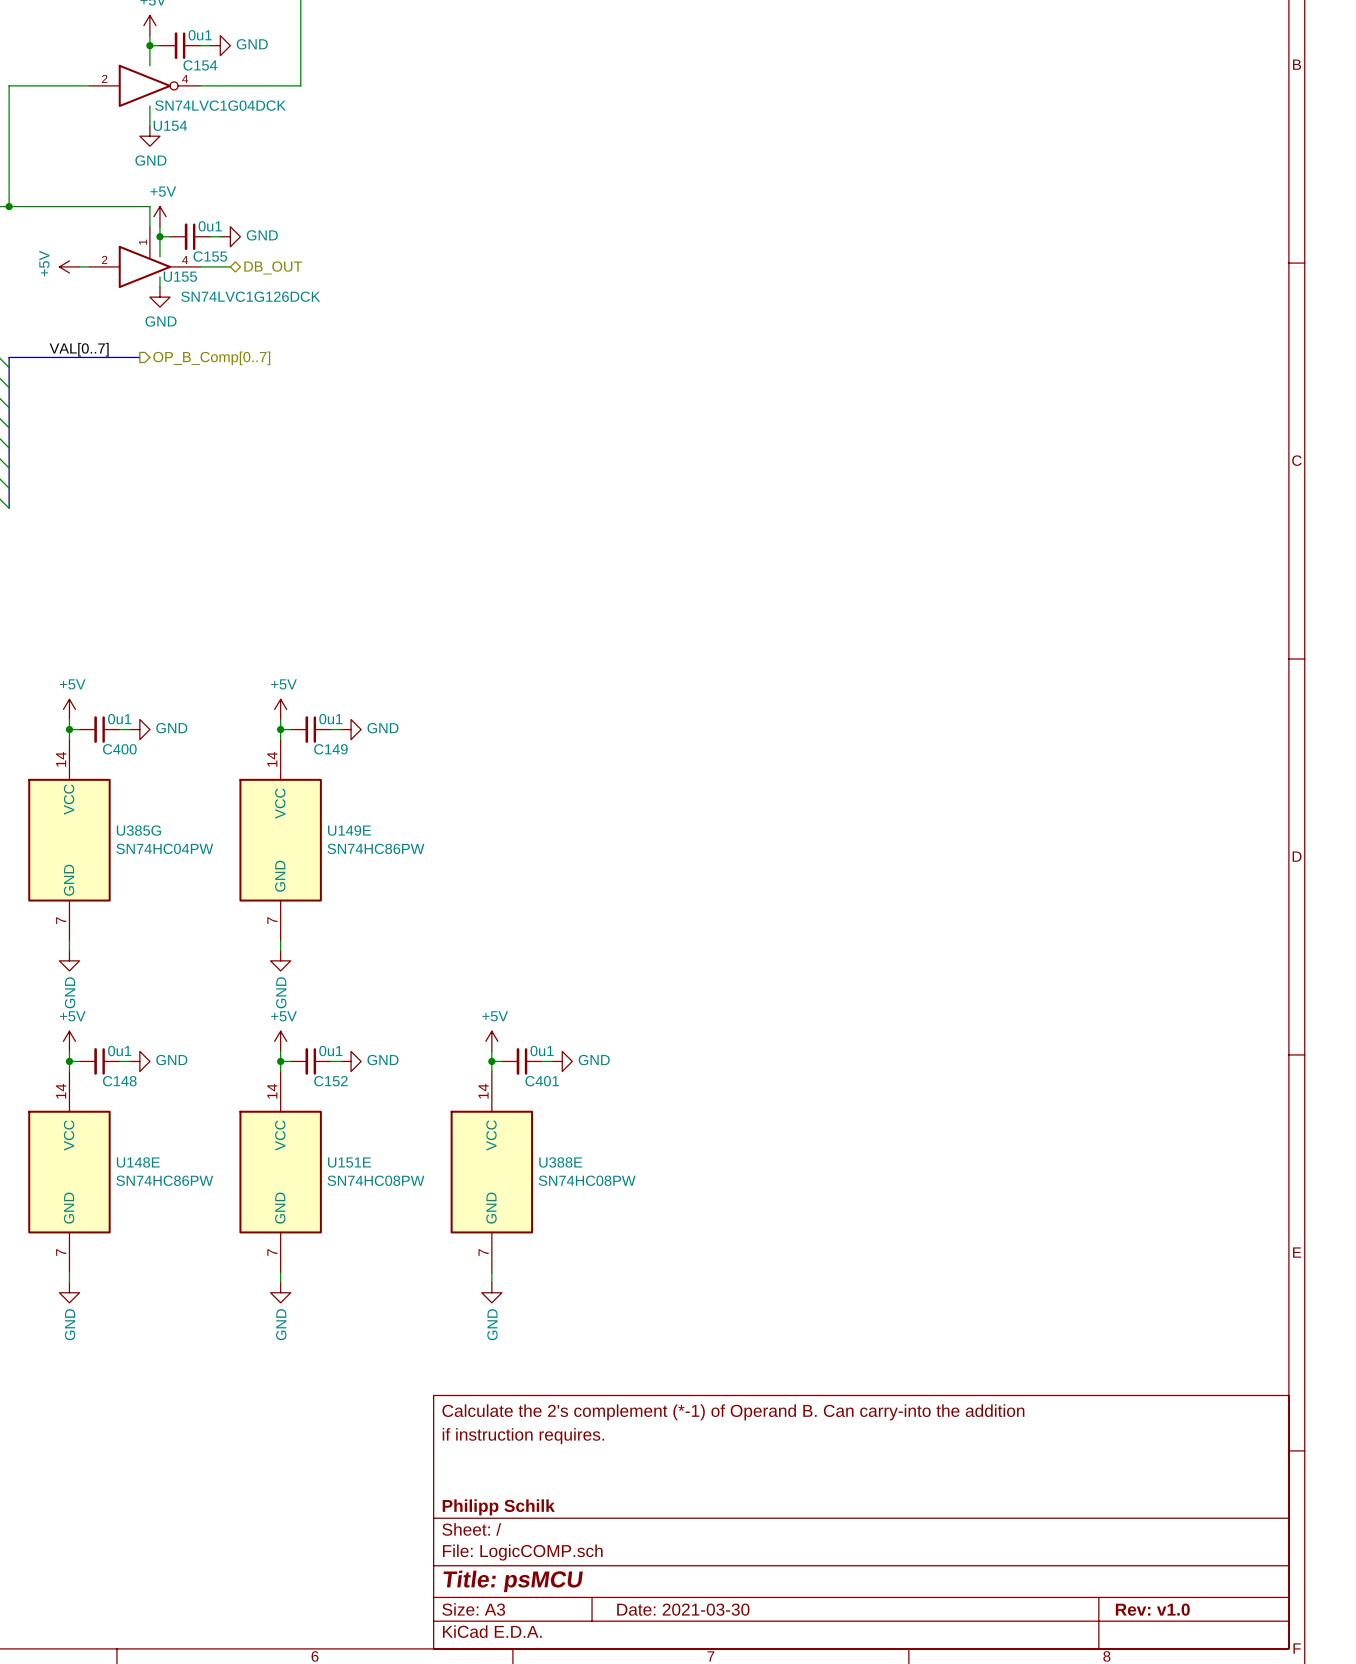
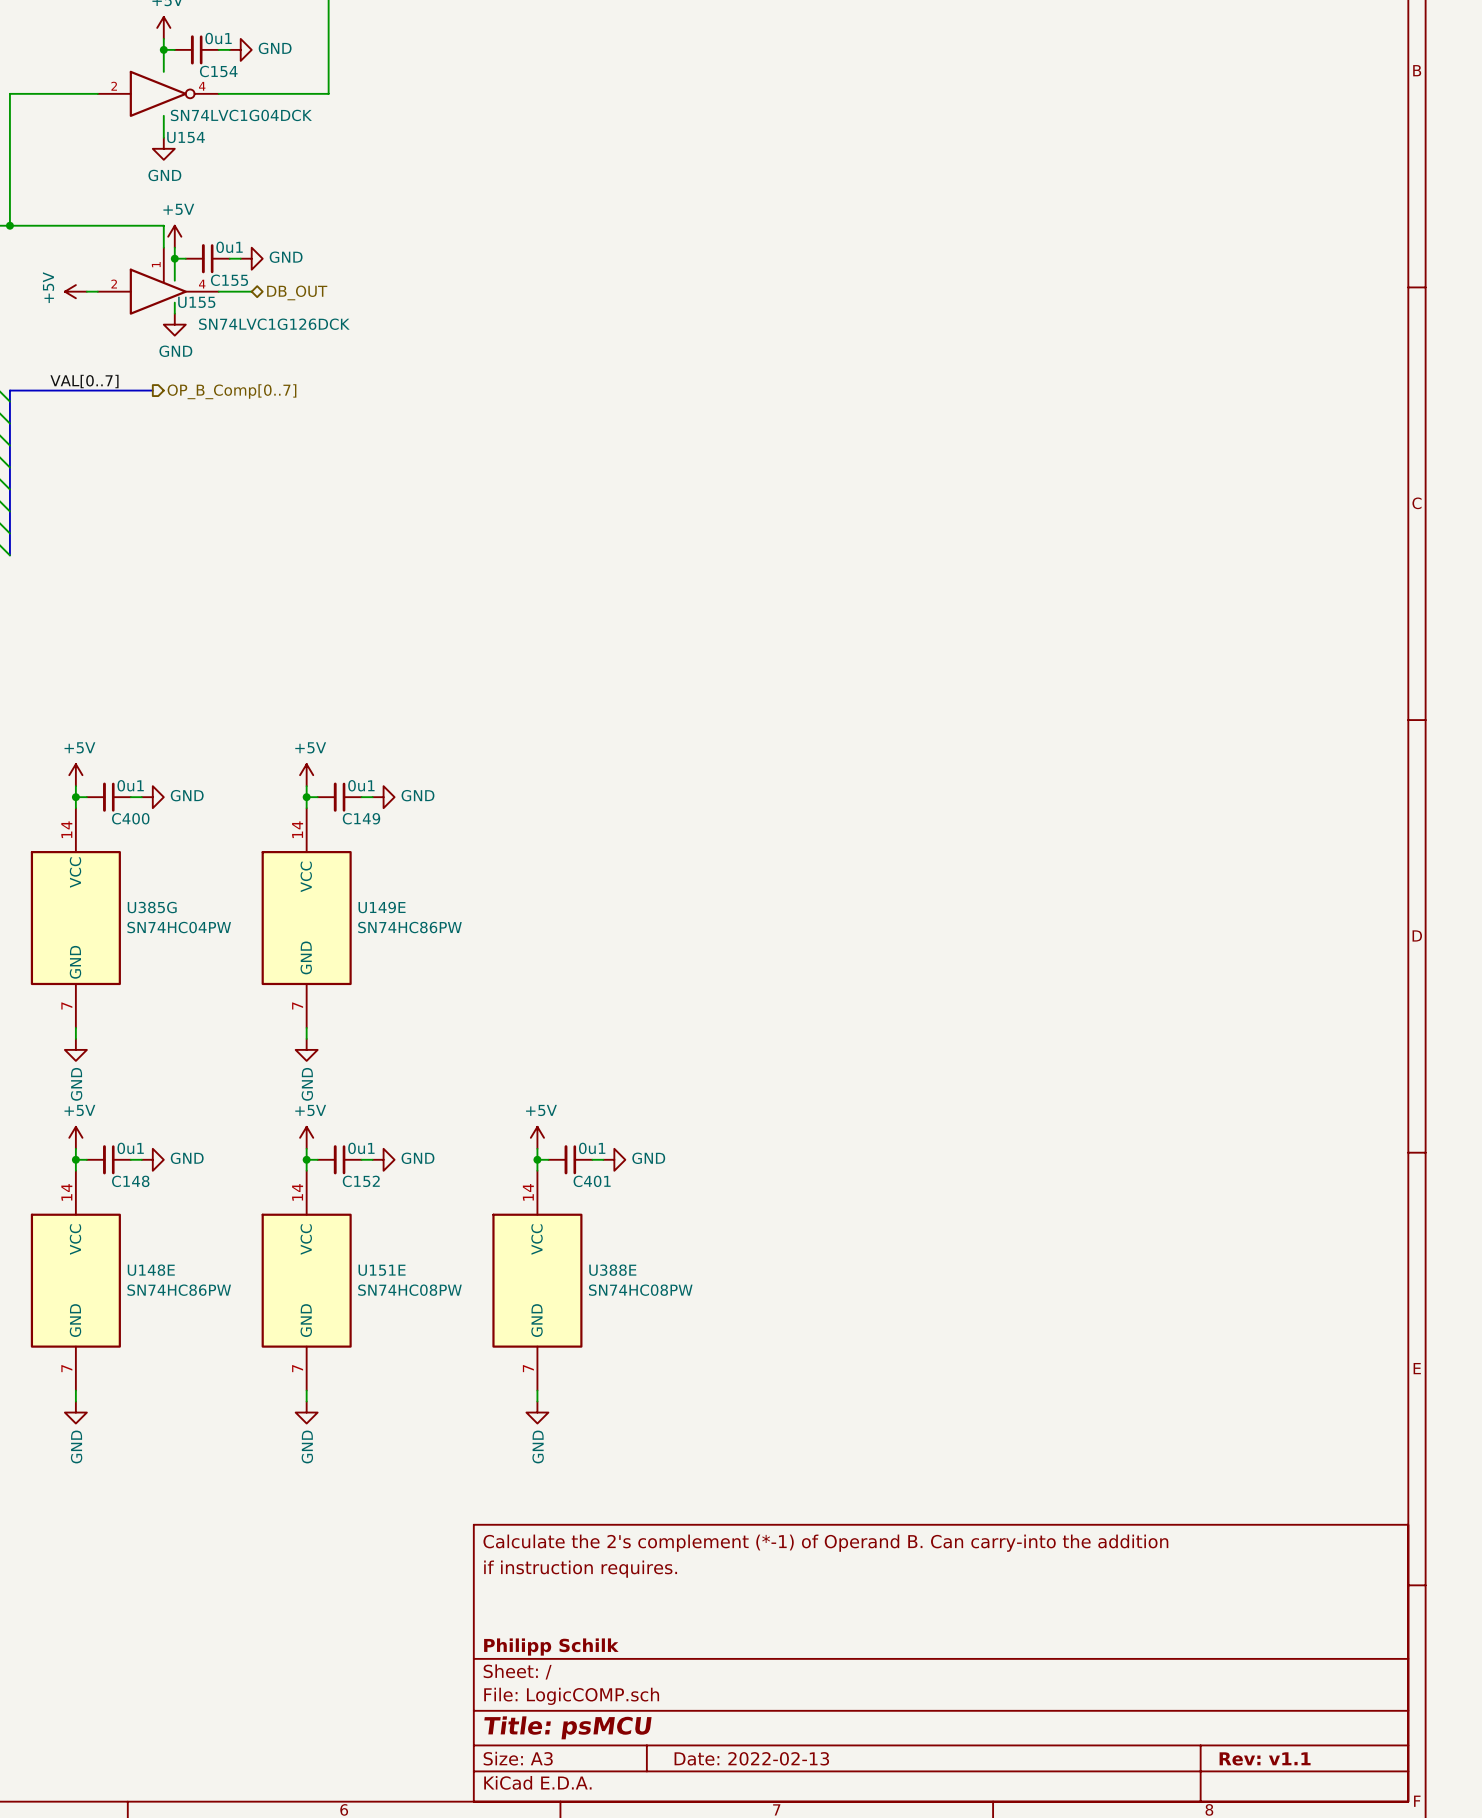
title block: Date: 2021-03-30 (683, 1609) -> Date: 2022-02-13 (751, 1758)
title block: Rev: v1.0 (1152, 1609) -> Rev: v1.1 (1265, 1758)

